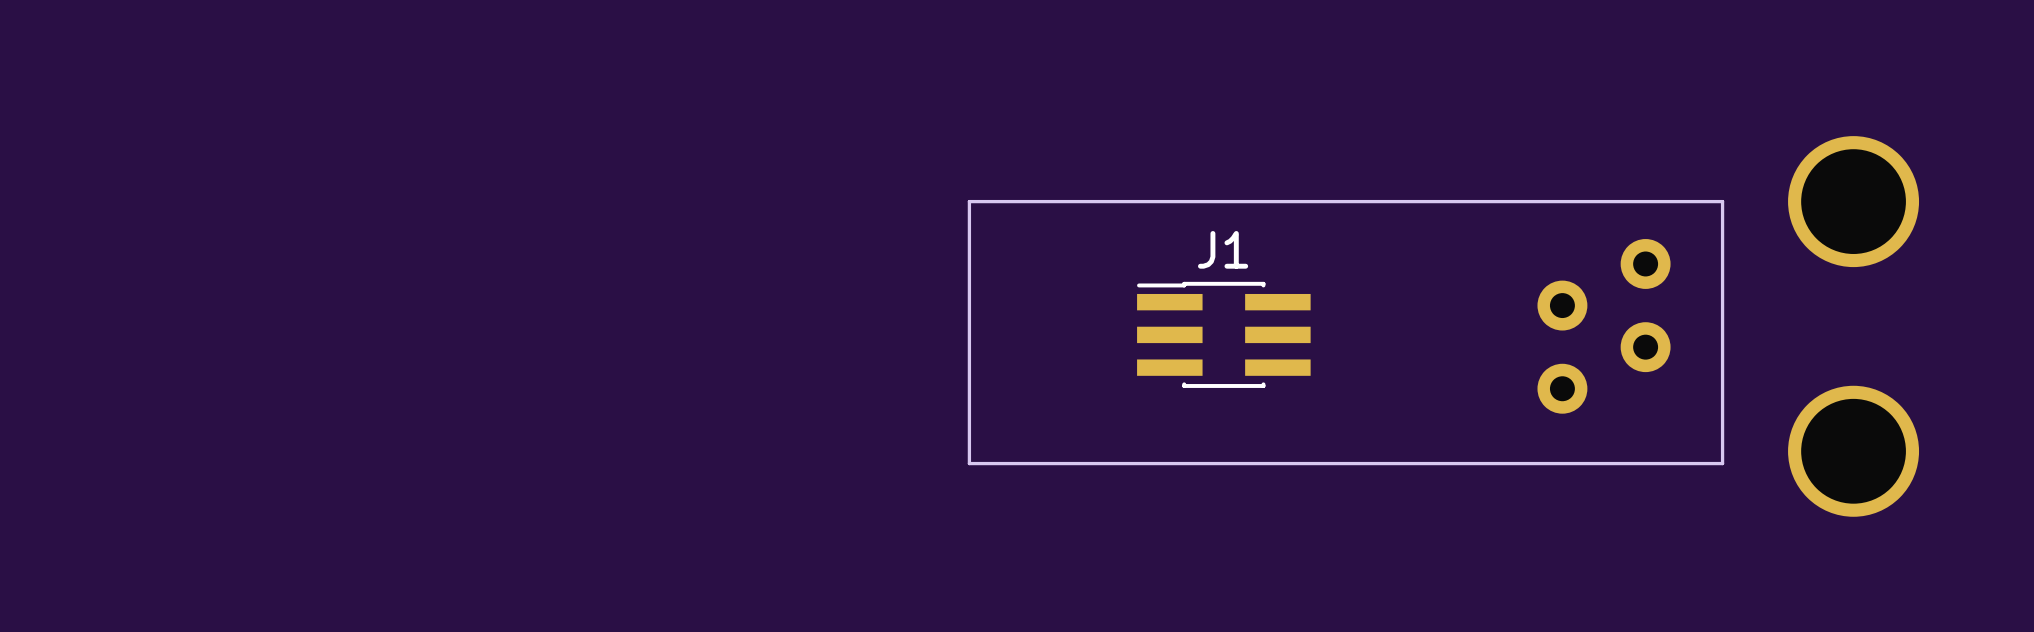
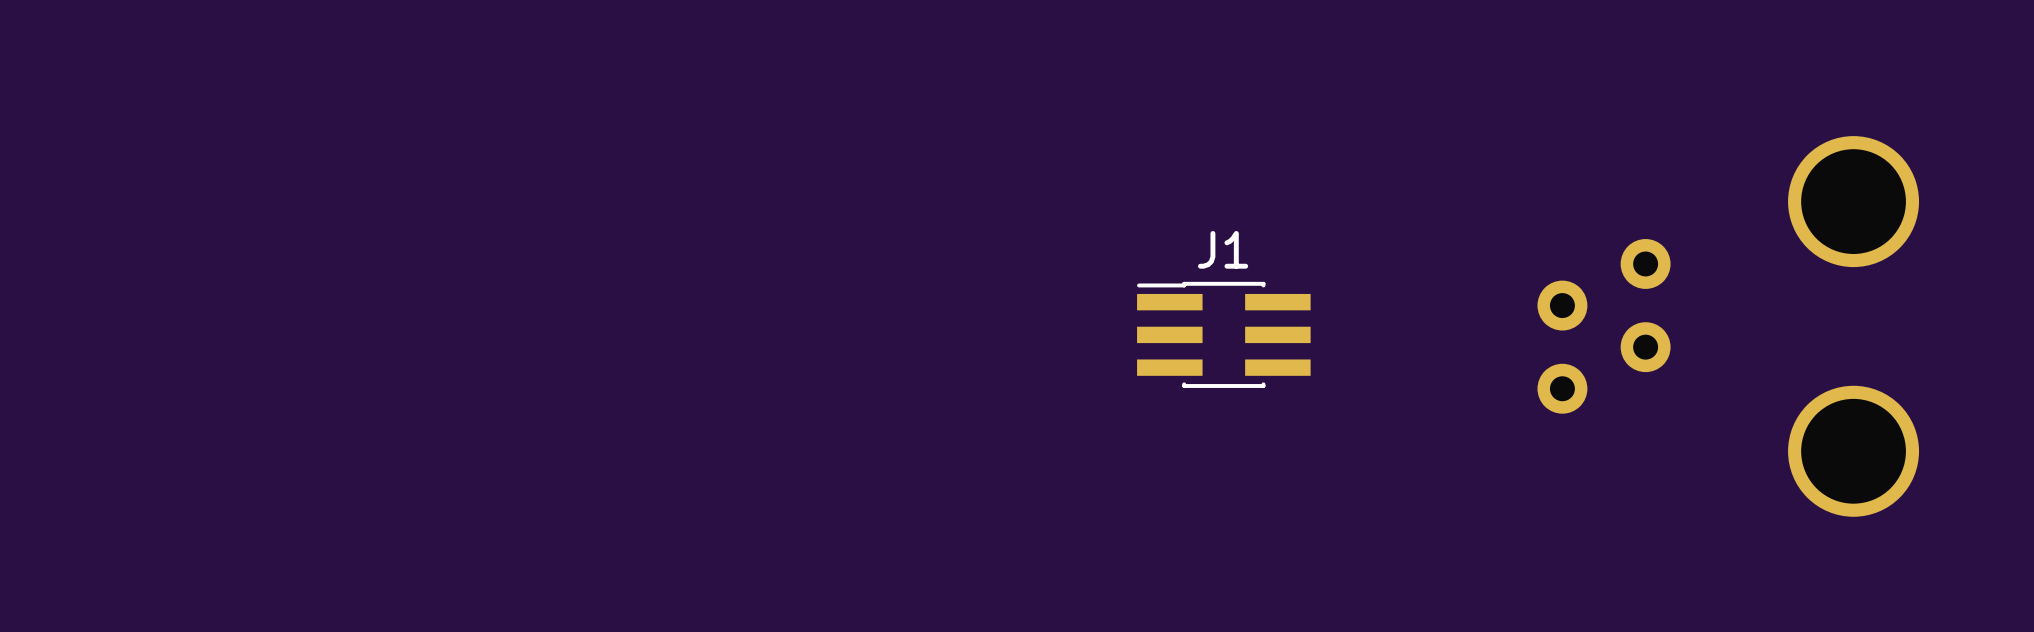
board edge: (1722, 201) (1722, 463) (969, 463) (969, 201) (1722, 201) -> none

